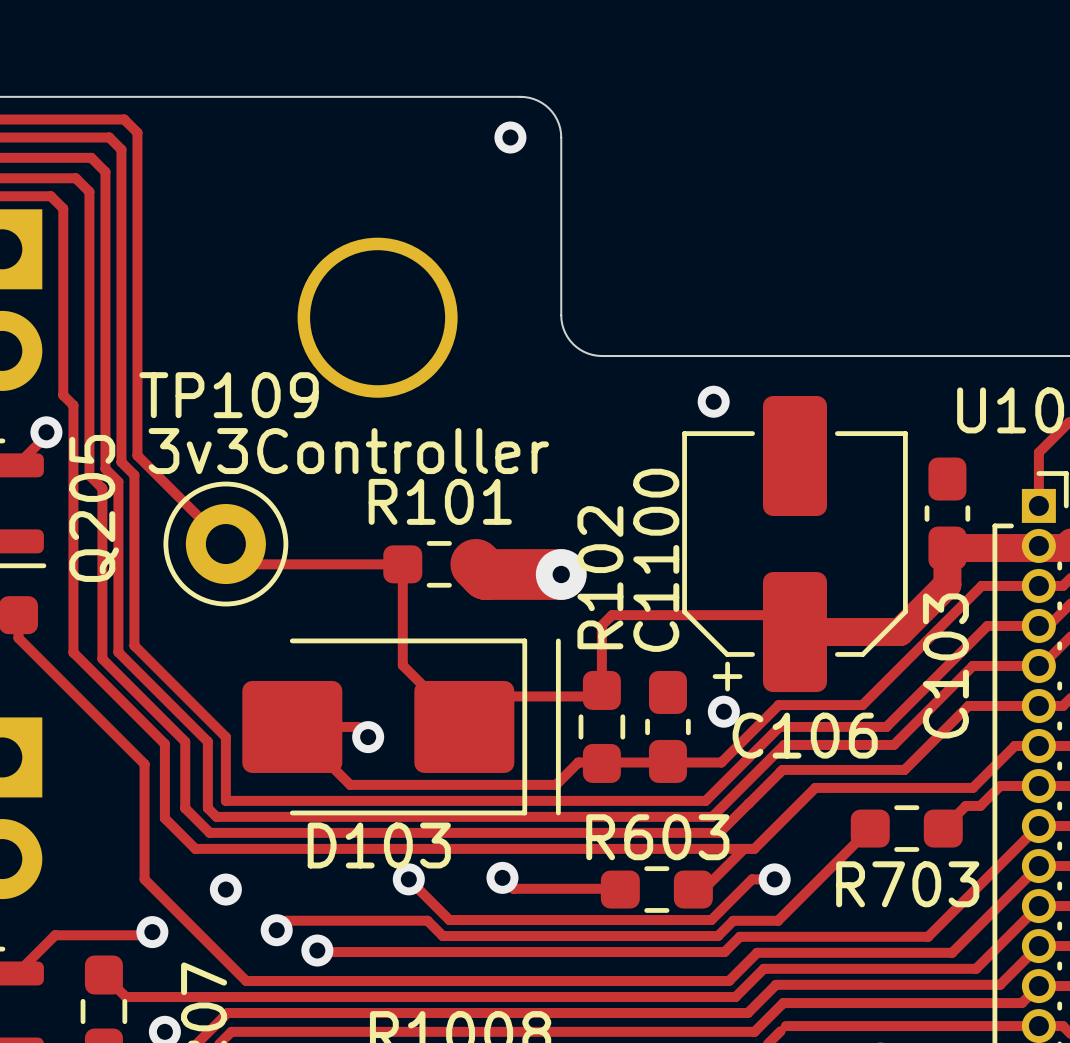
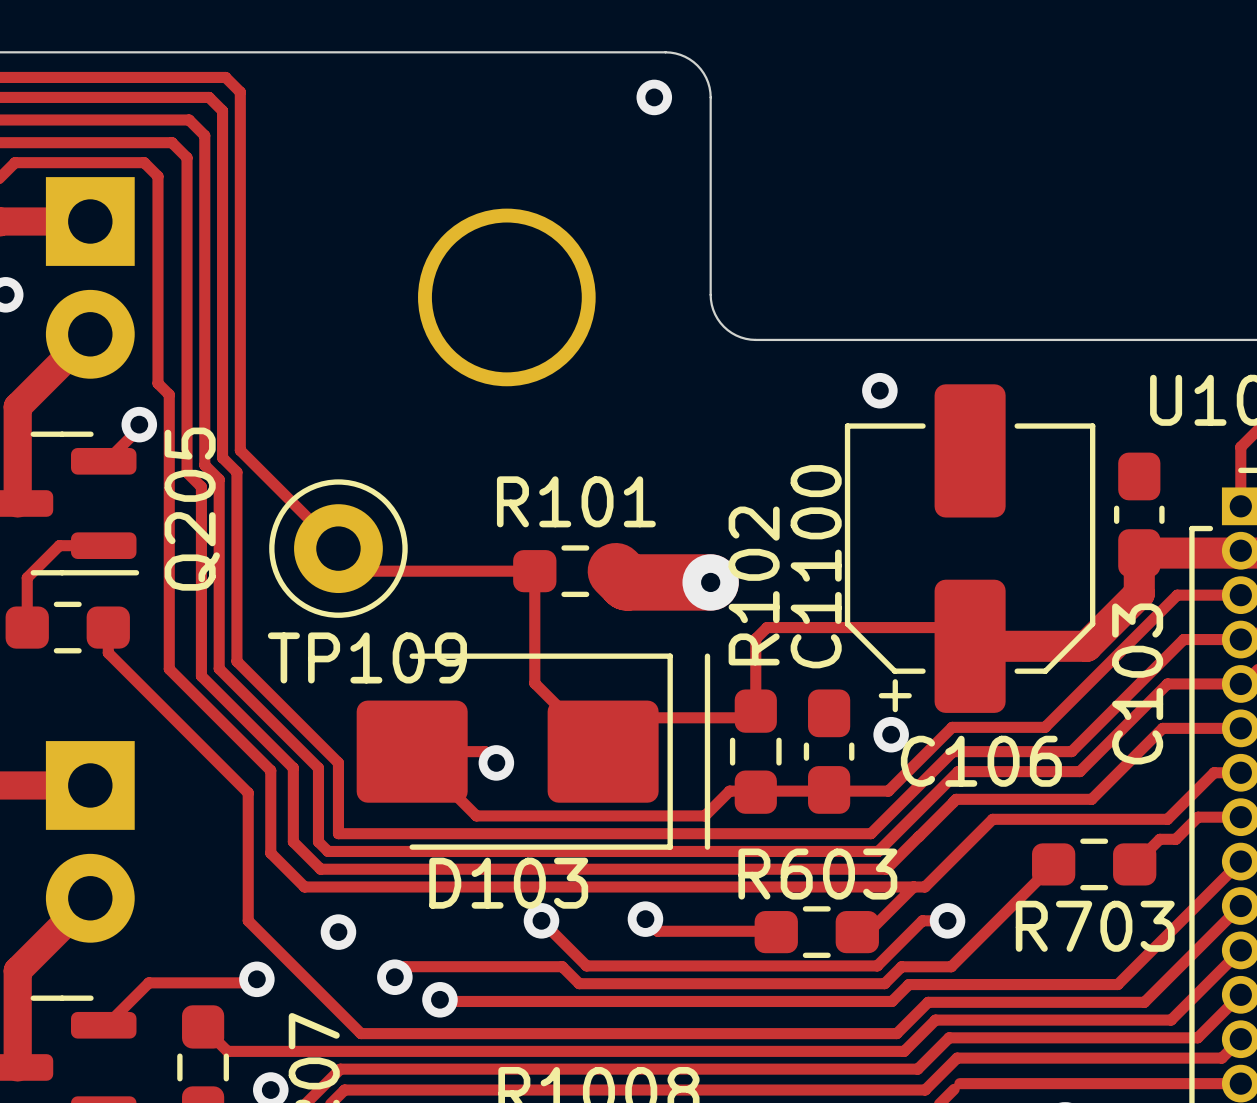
TP109 name position: TP109 (229, 395) -> TP109 (367, 657)
TP109 value: 3v3Controller (348, 451) -> none

